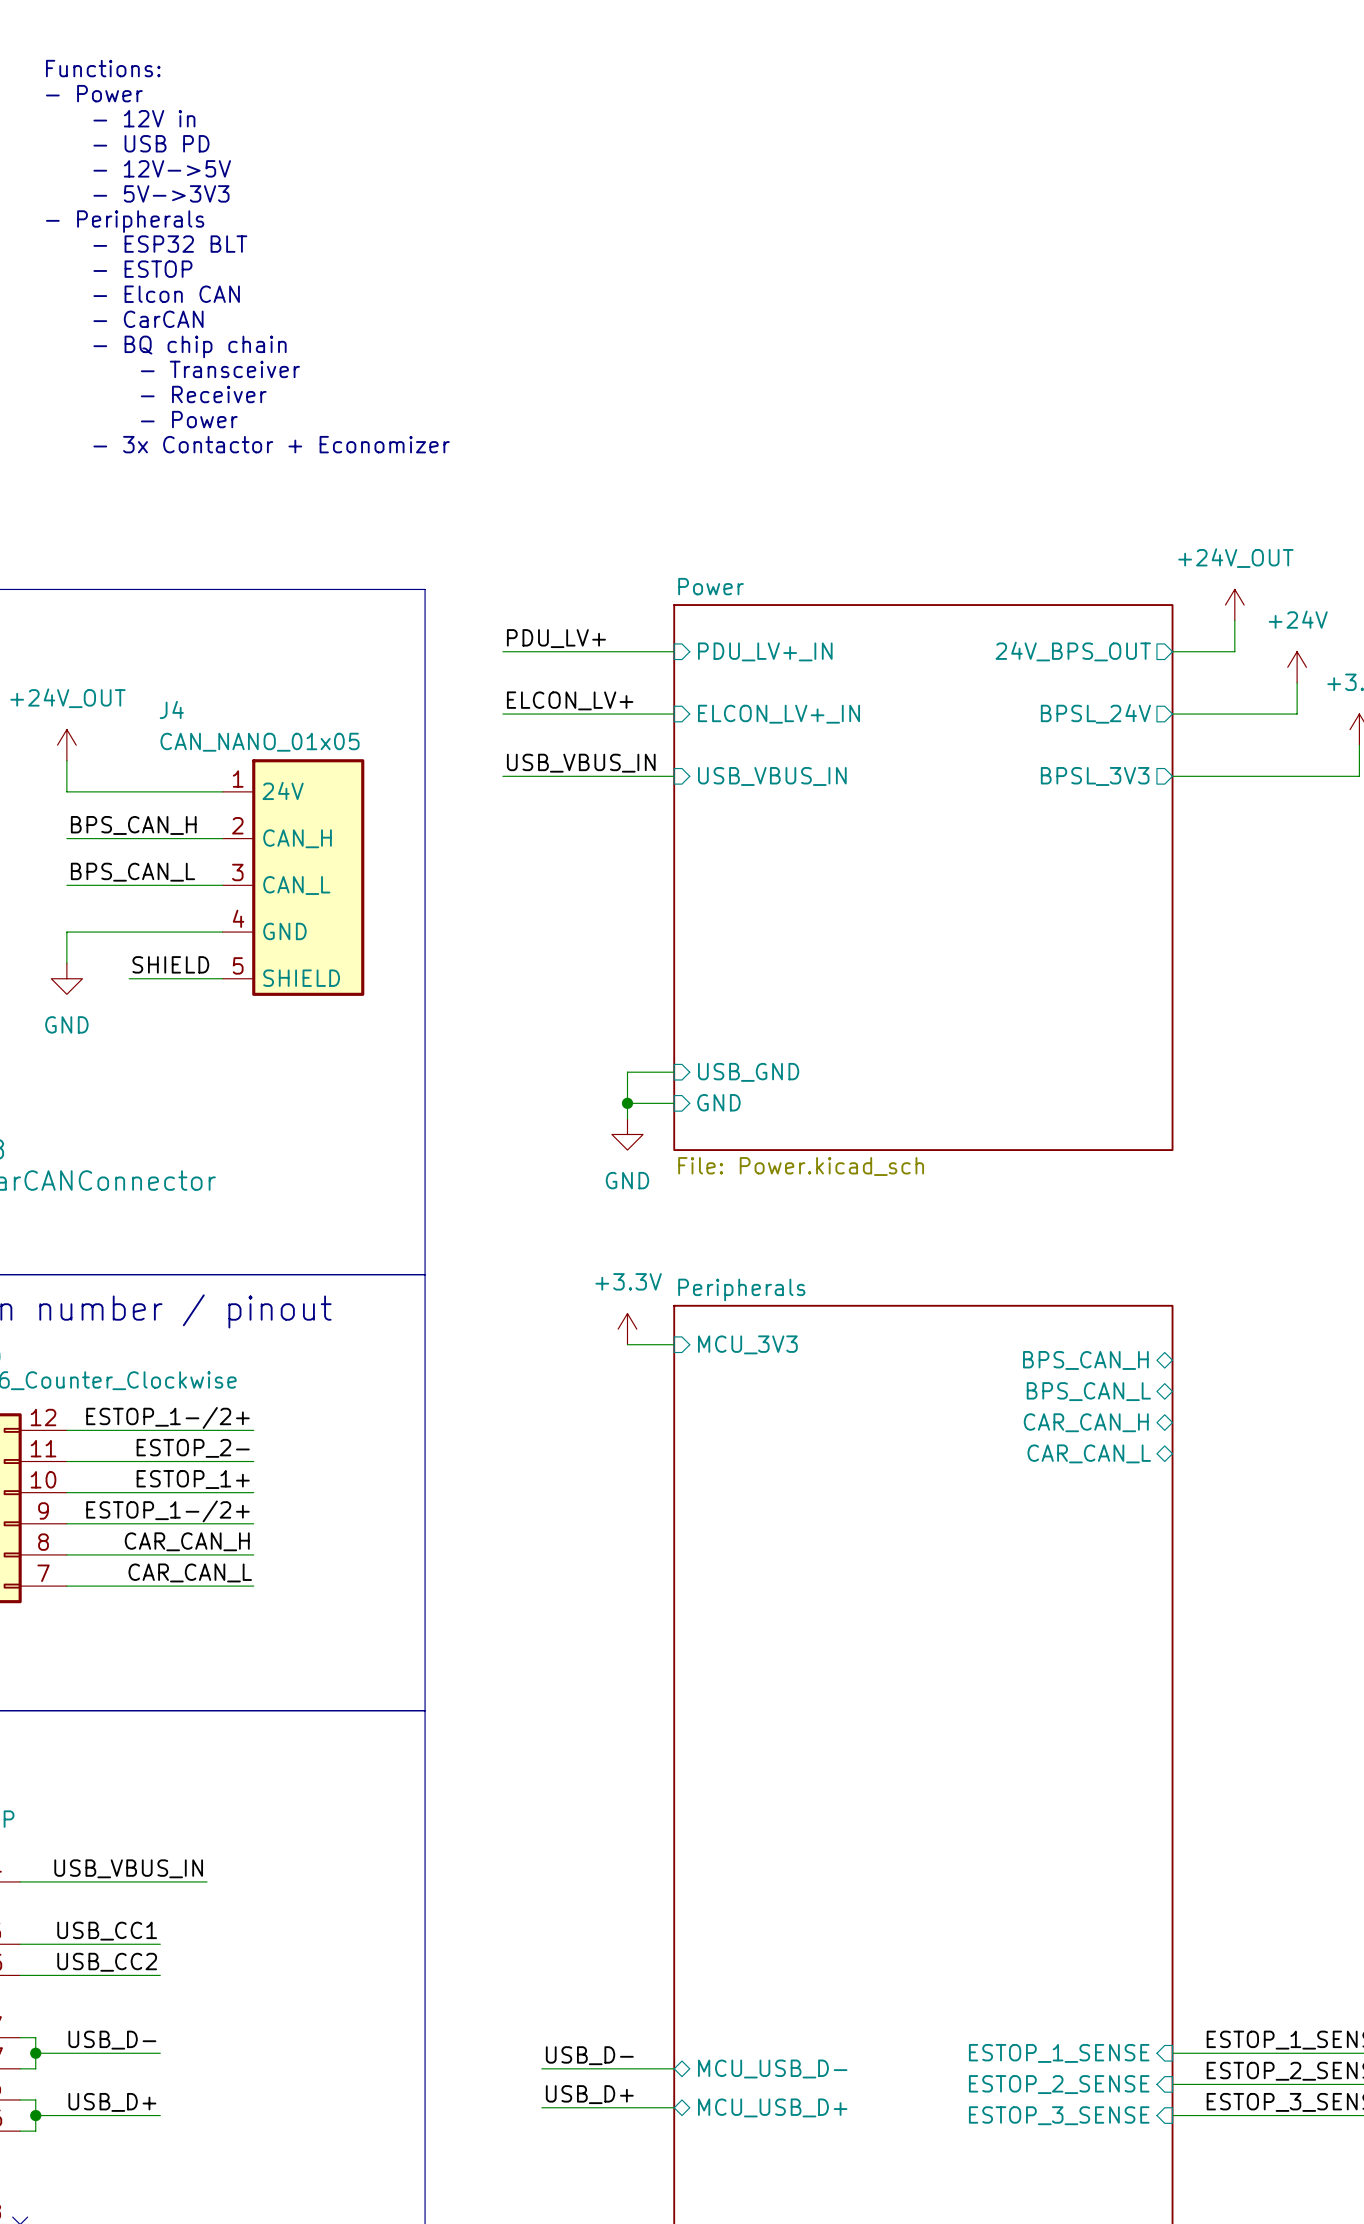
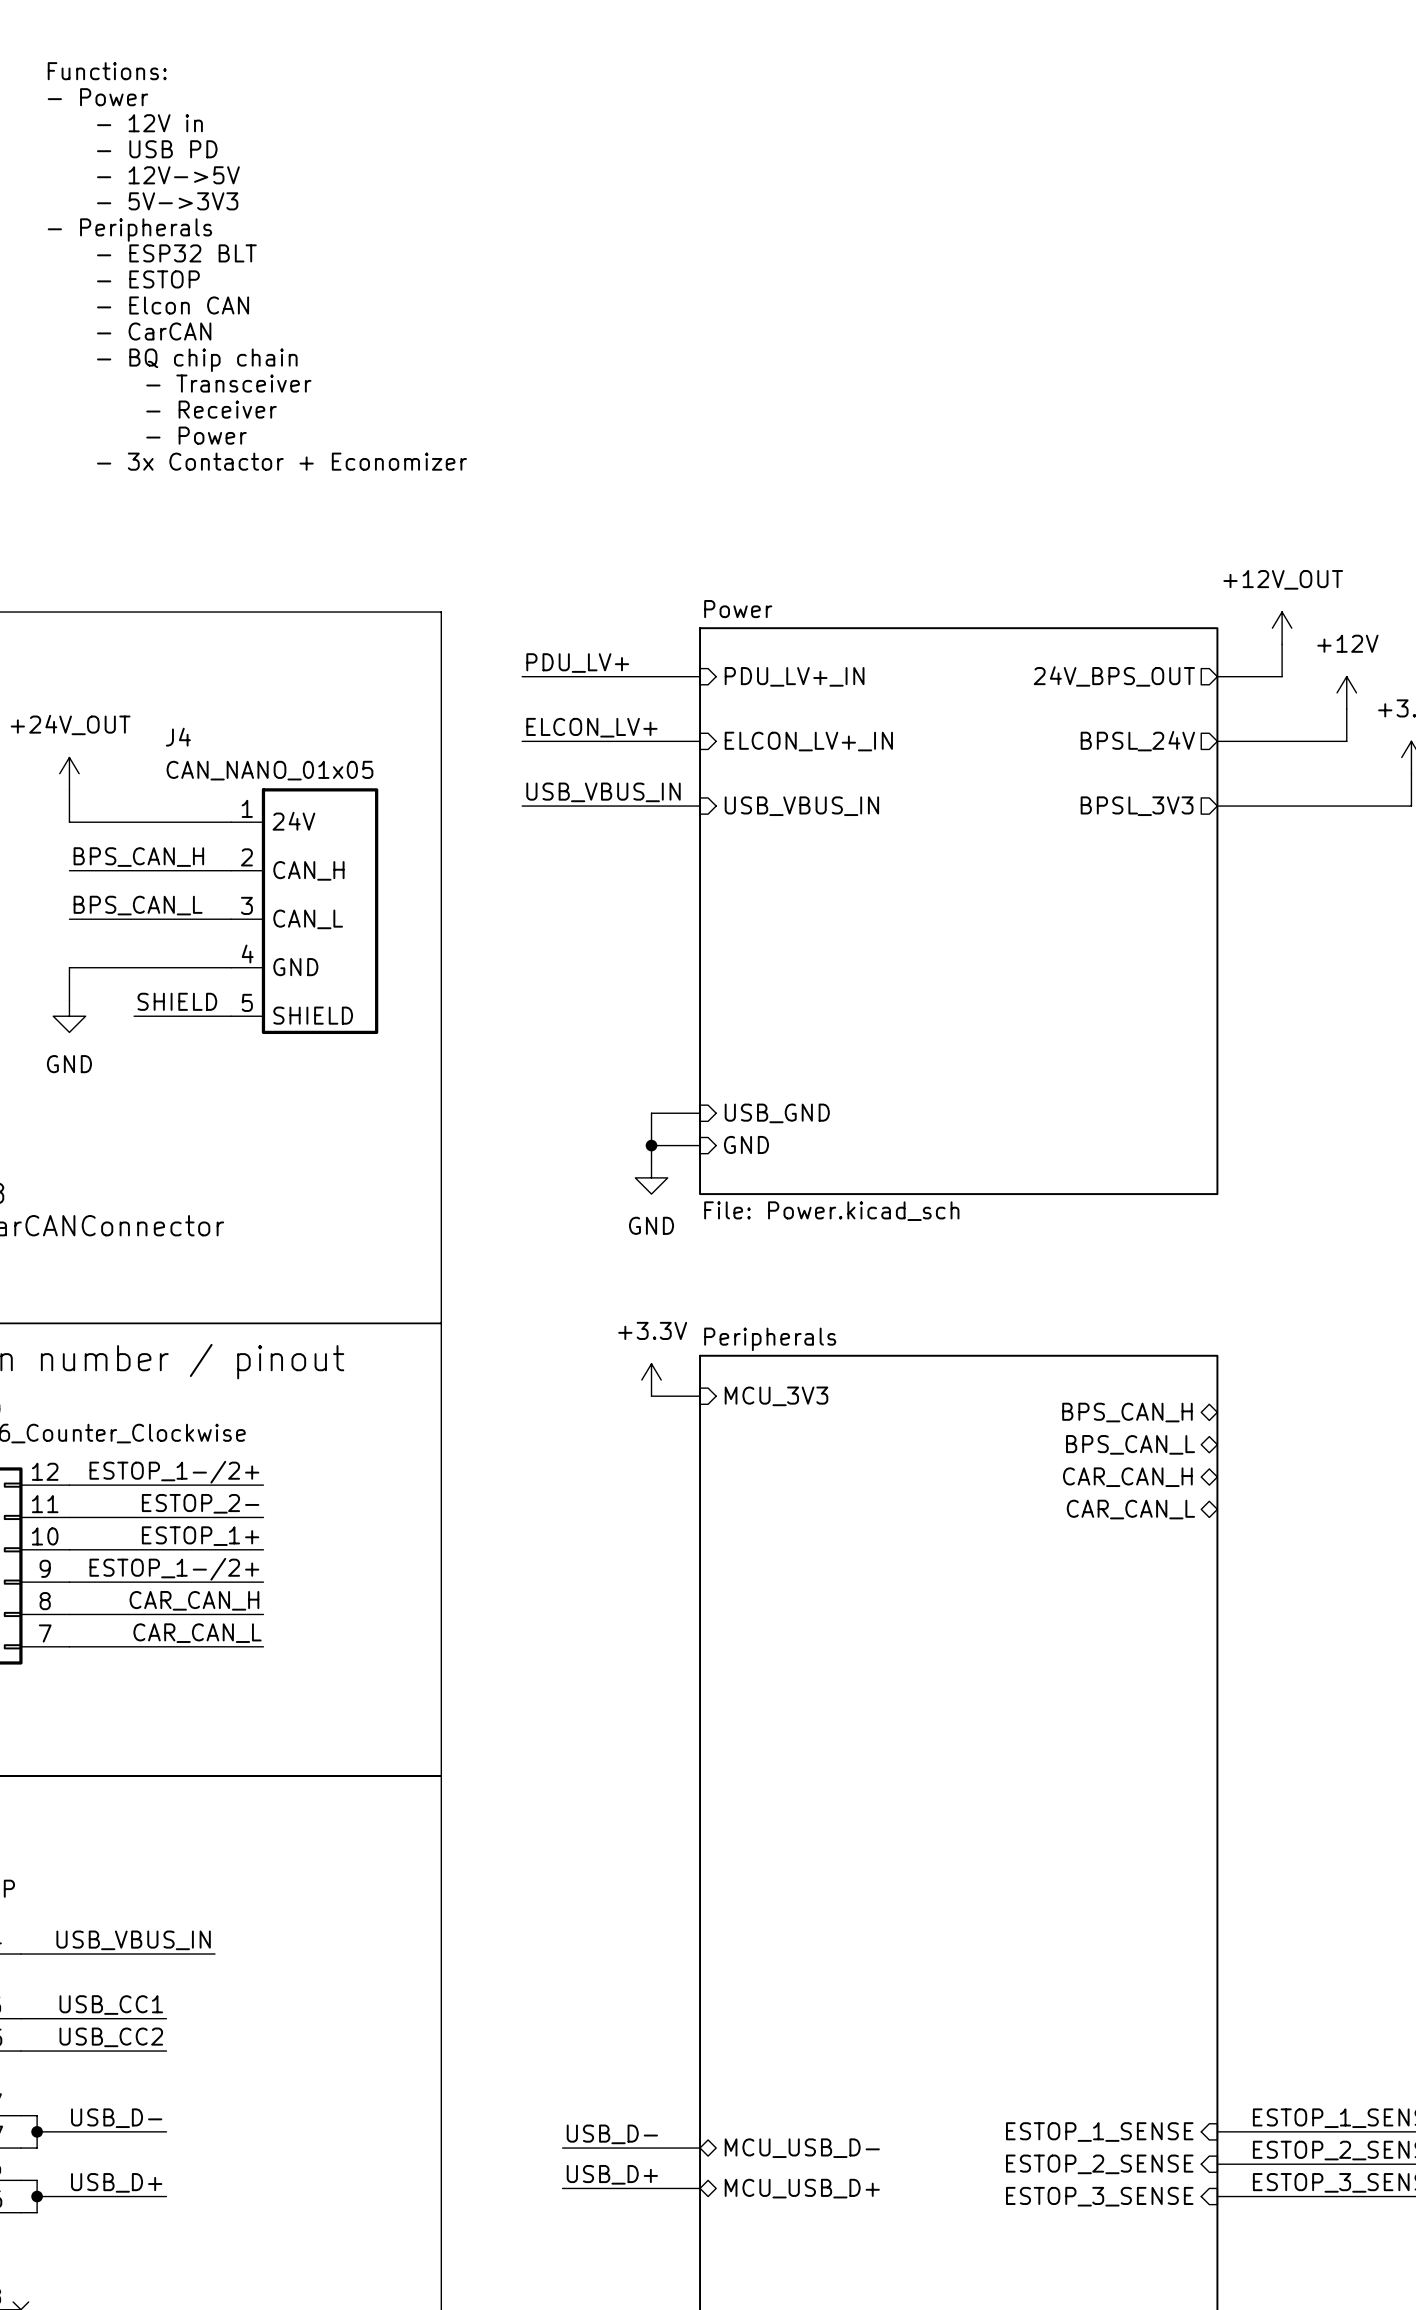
power symbol: +24V_OUT (1234, 605) -> +12V_OUT (1282, 628)
power symbol: +24V (1297, 667) -> +12V (1346, 692)

